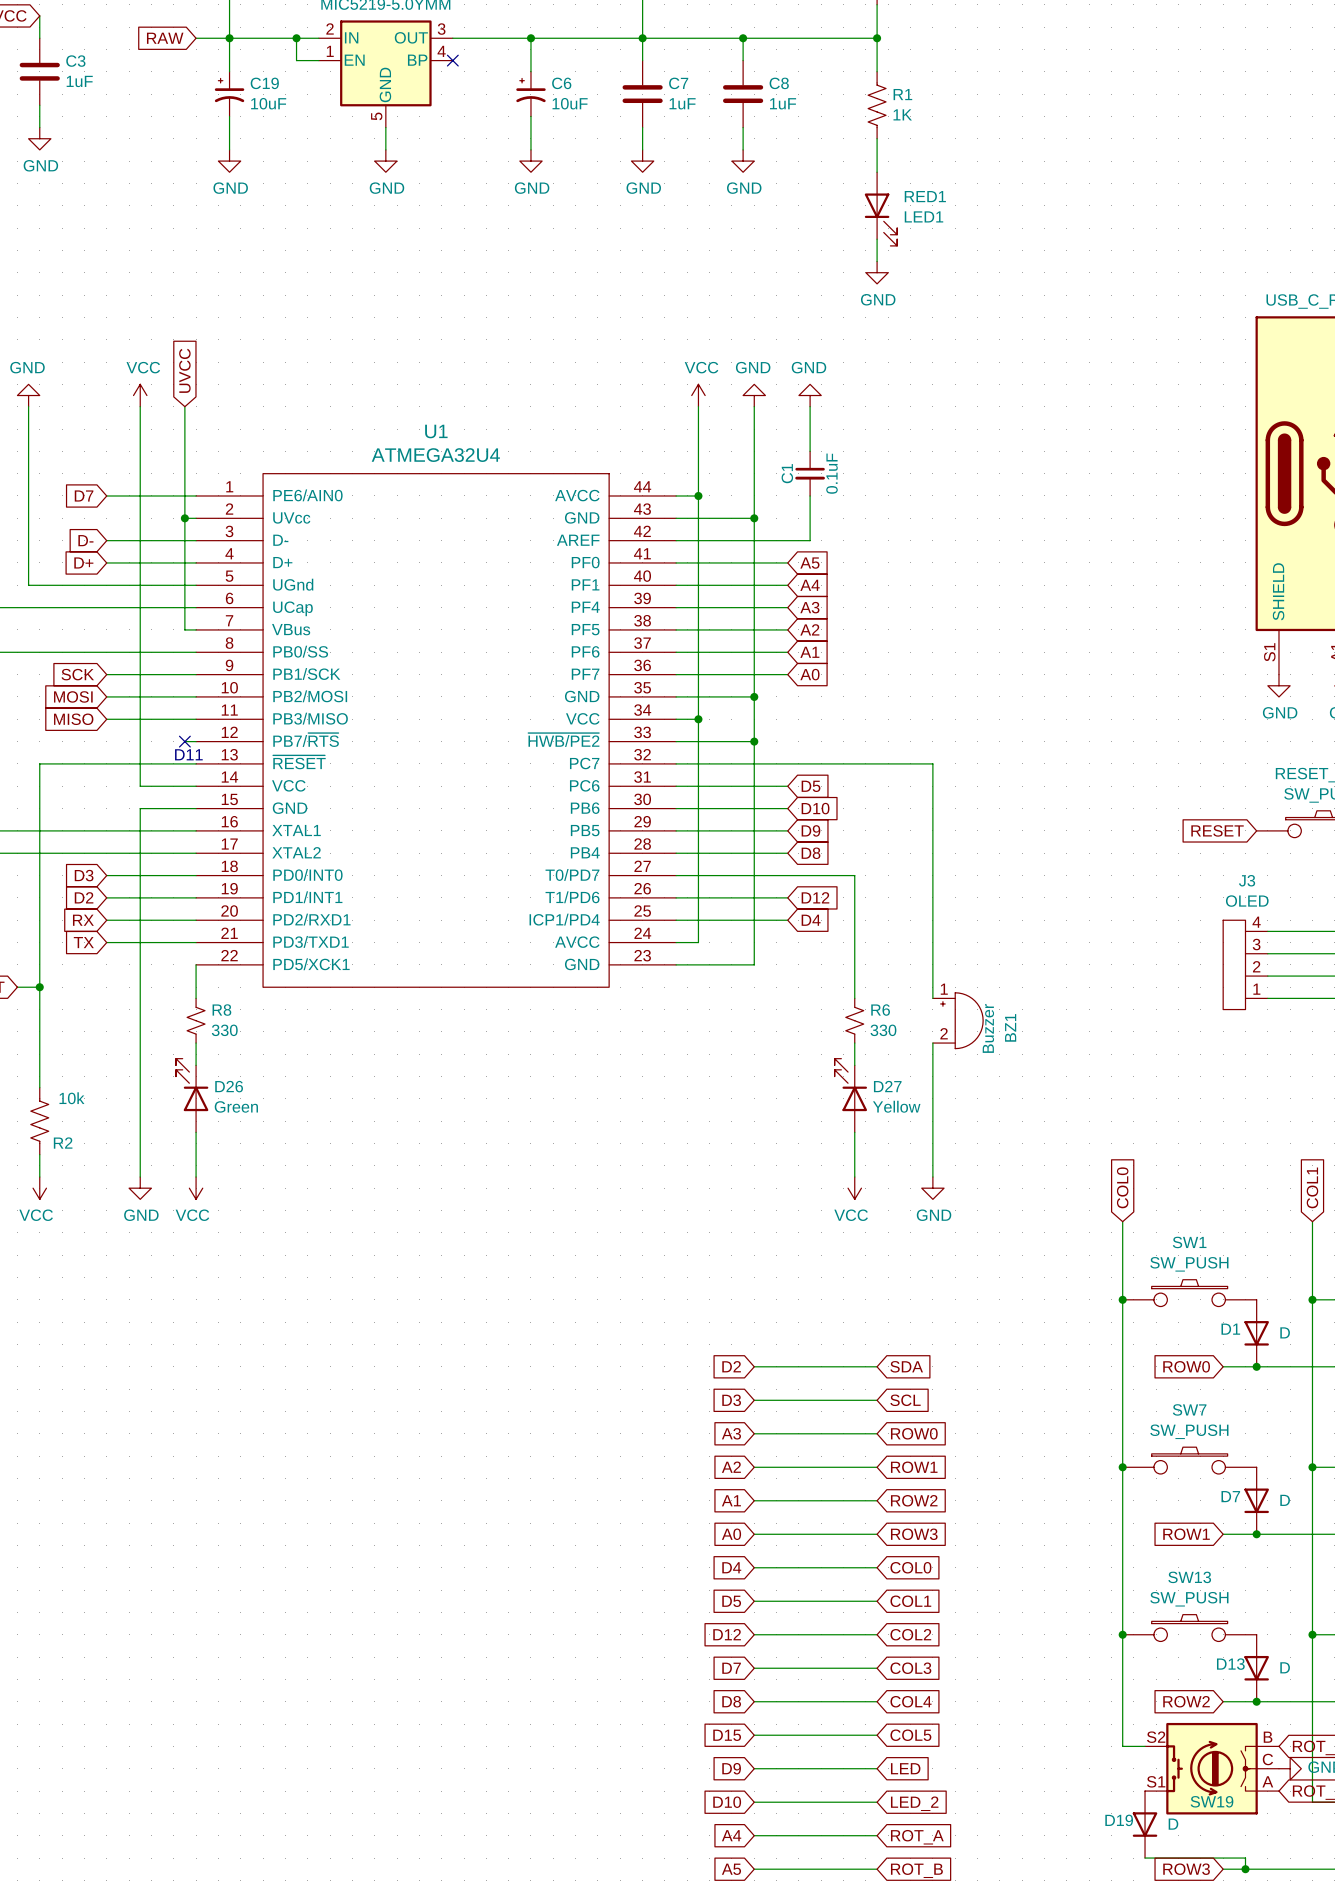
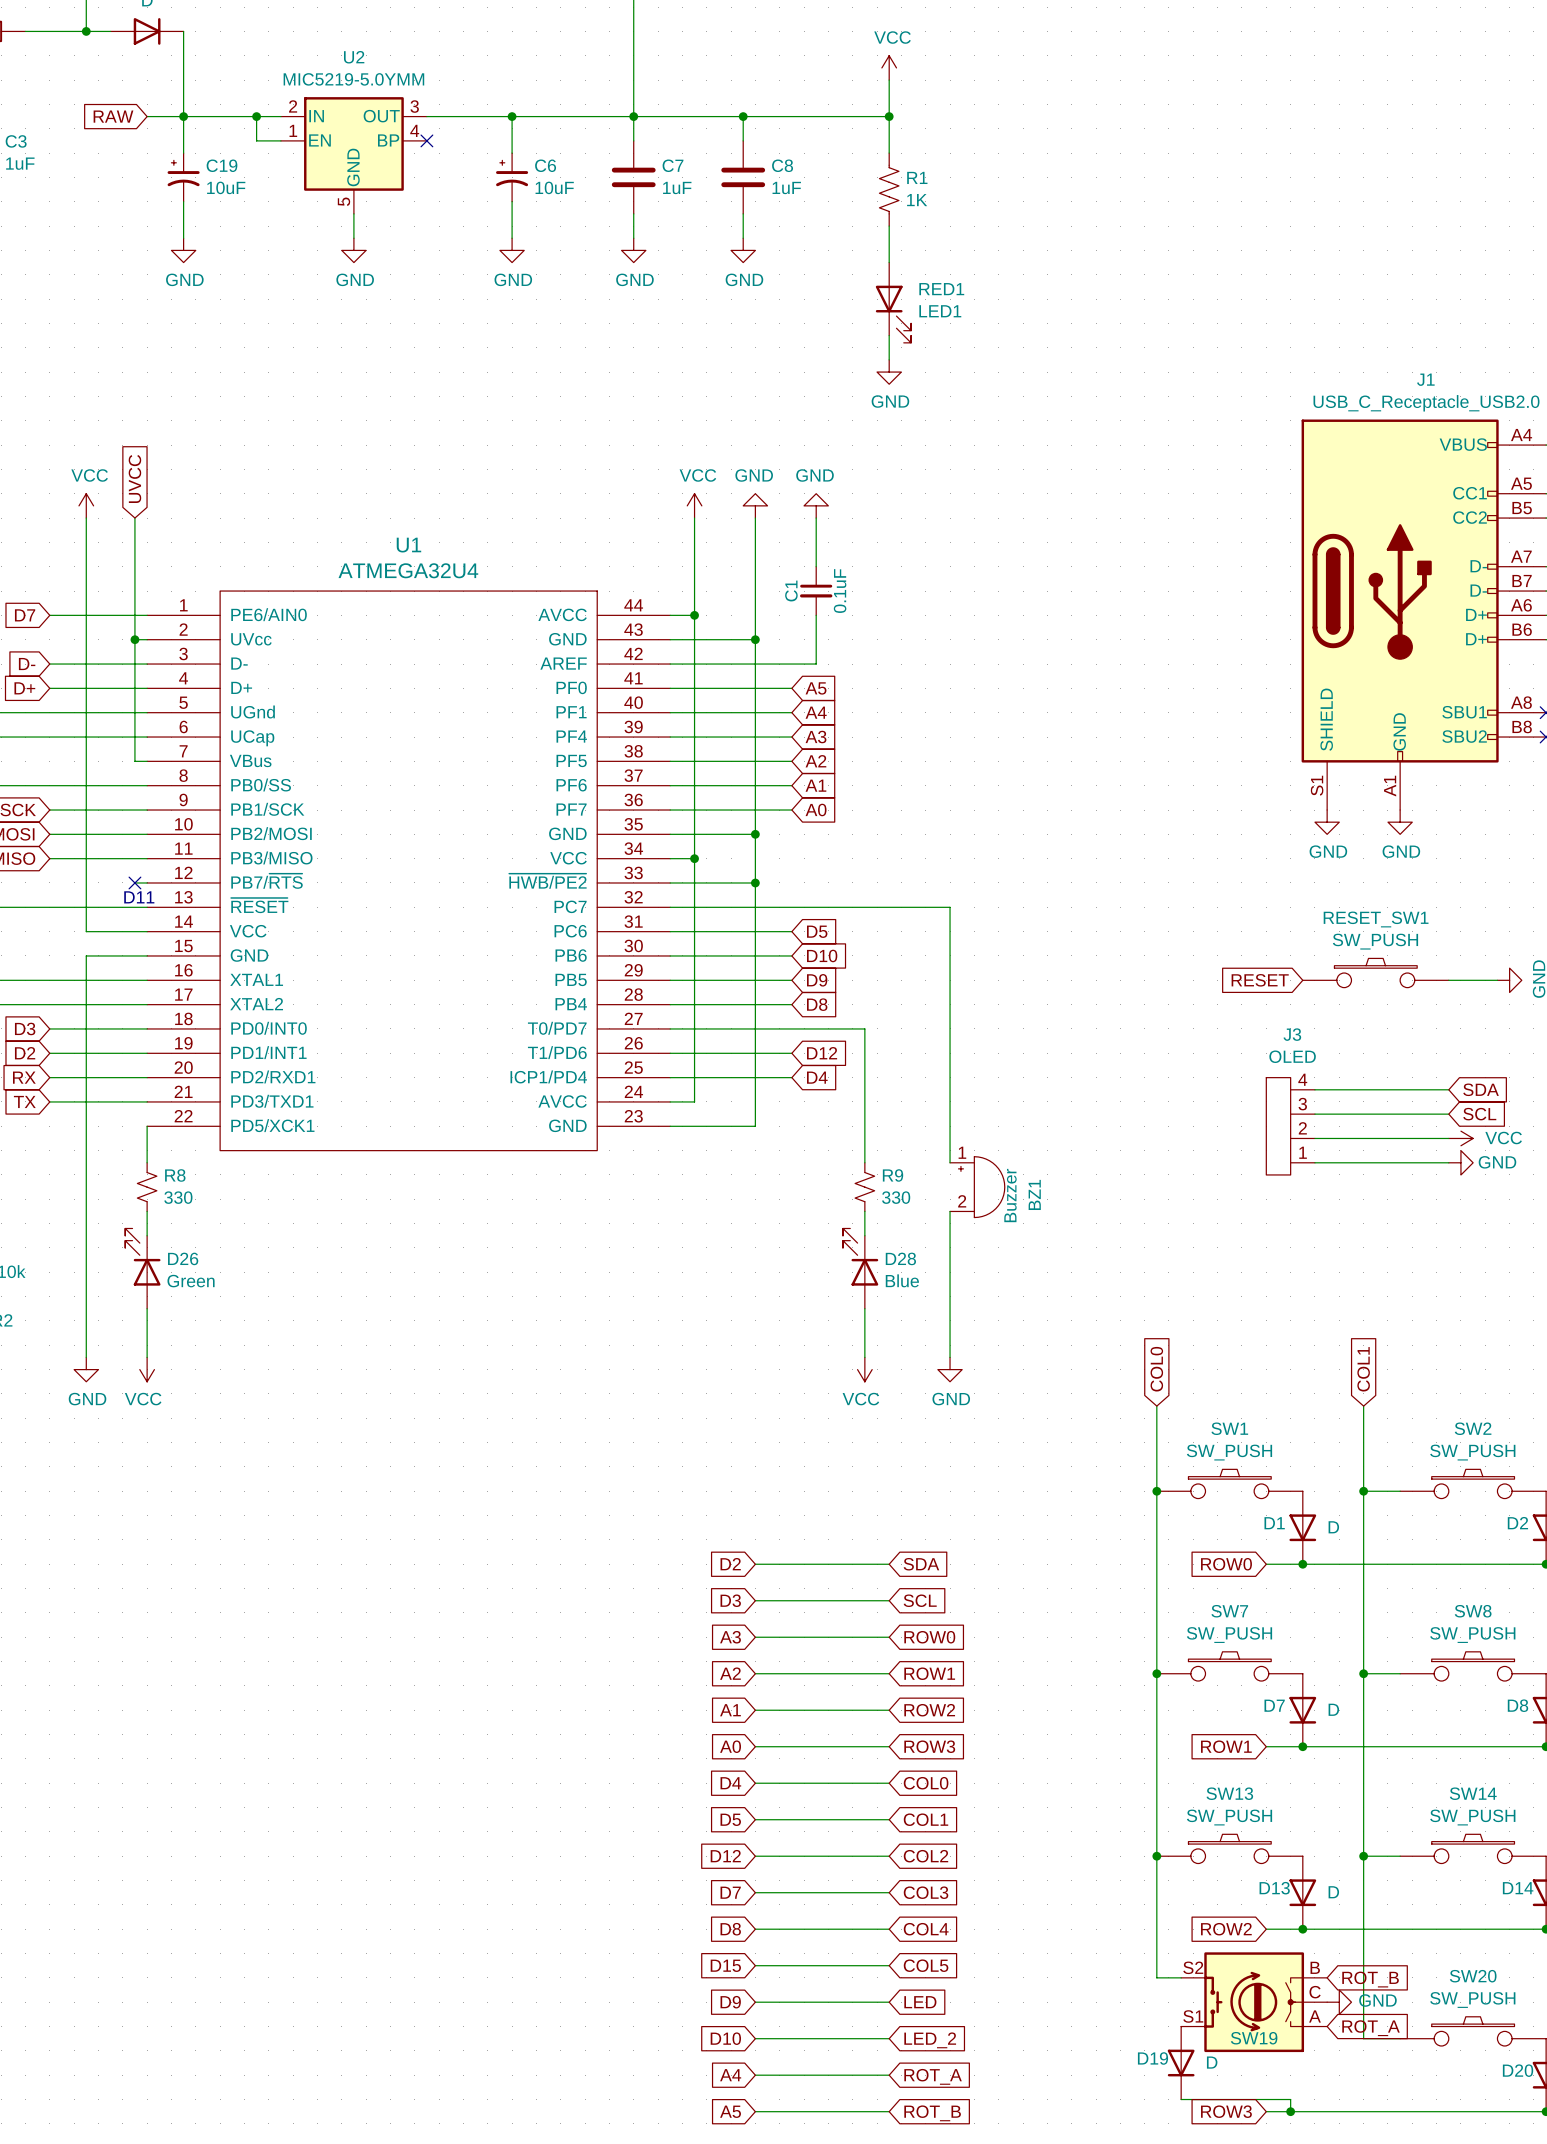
R6 name: R6 (880, 1010) -> R9 (893, 1175)
D27 name: D27 (887, 1086) -> D28 (900, 1258)
D27 value: Yellow (896, 1106) -> Blue (902, 1280)

